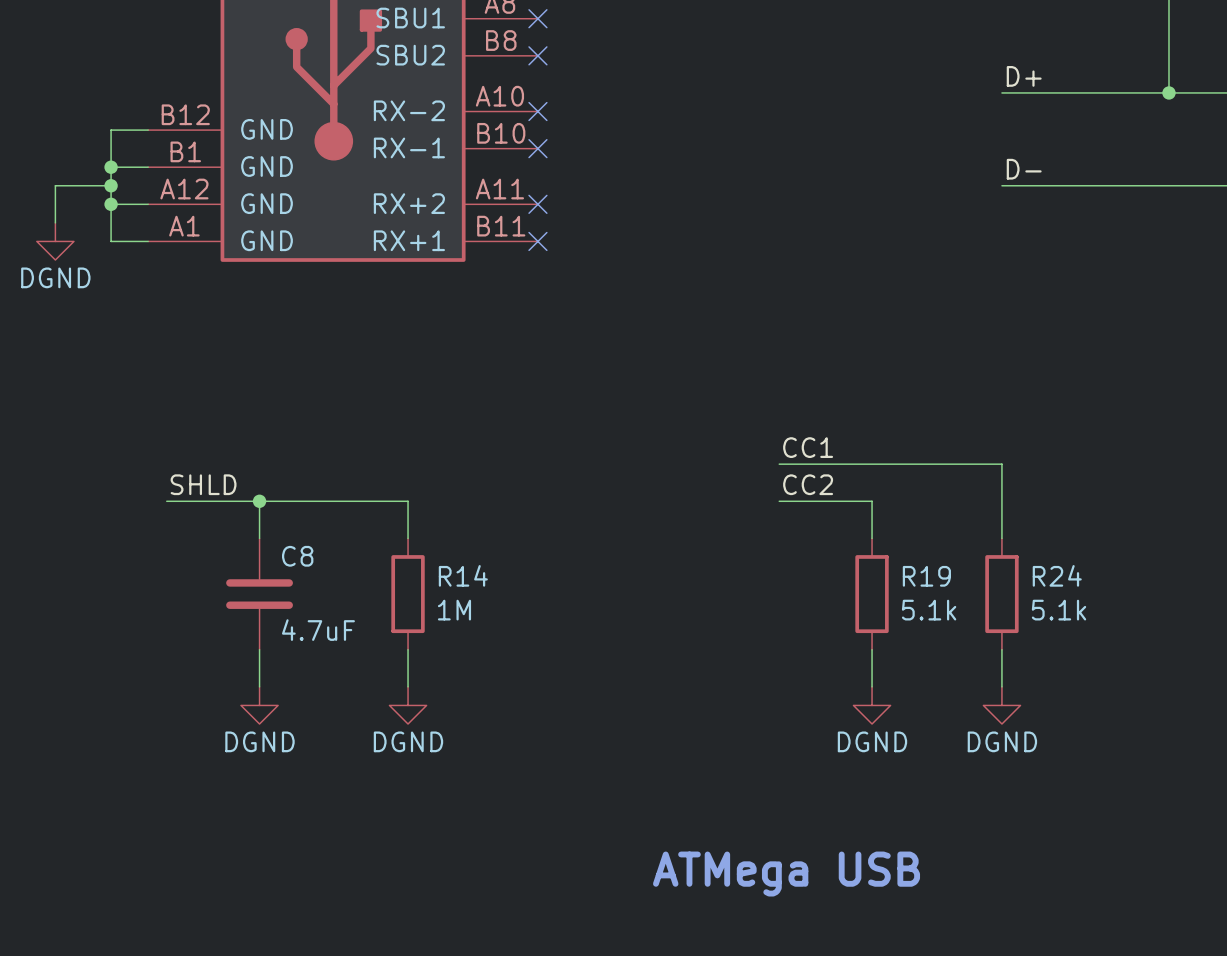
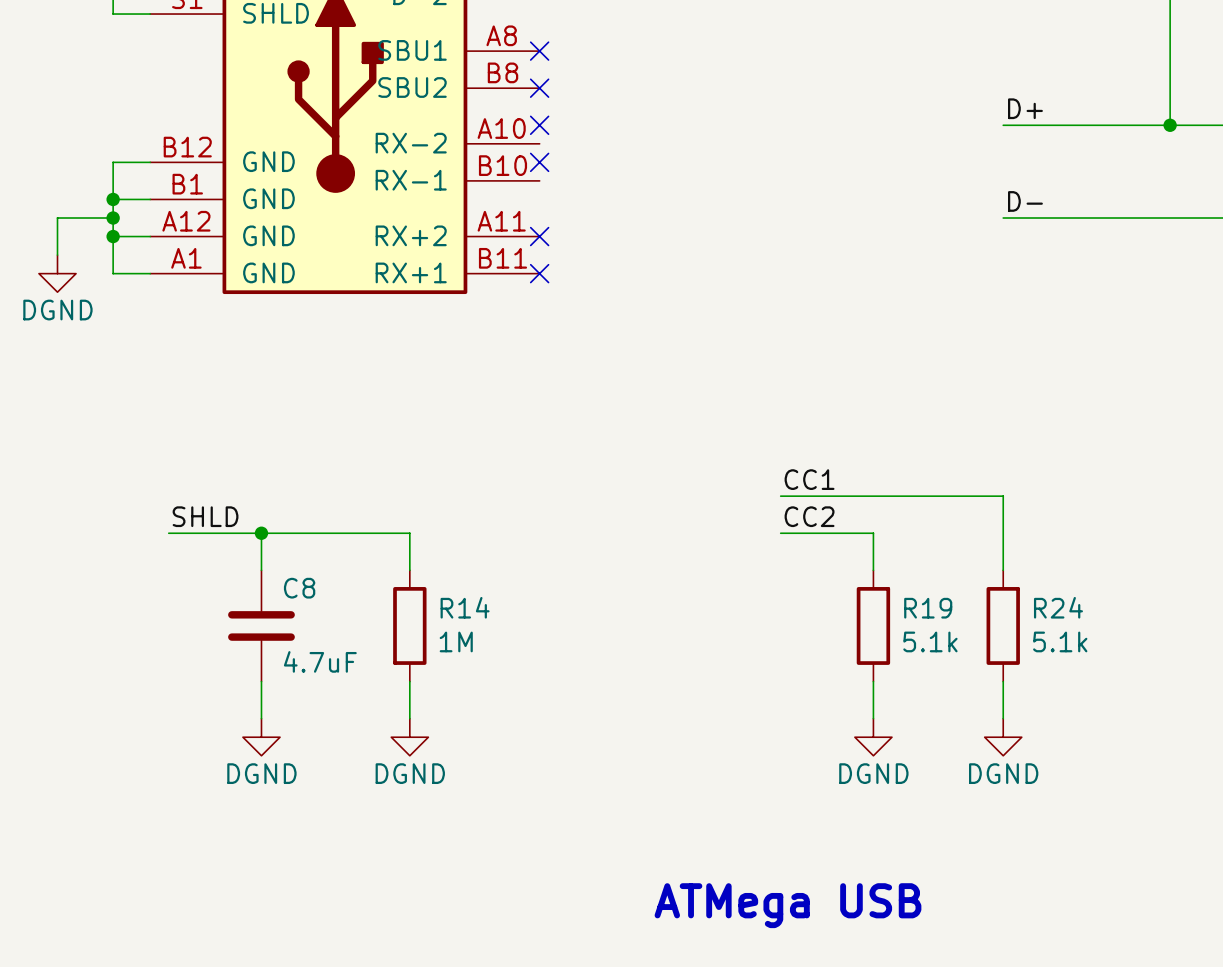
no-connect mark: none -> (539, 125)
no-connect mark: (537, 111) -> none
no-connect mark: none -> (539, 162)
no-connect mark: (537, 148) -> none

